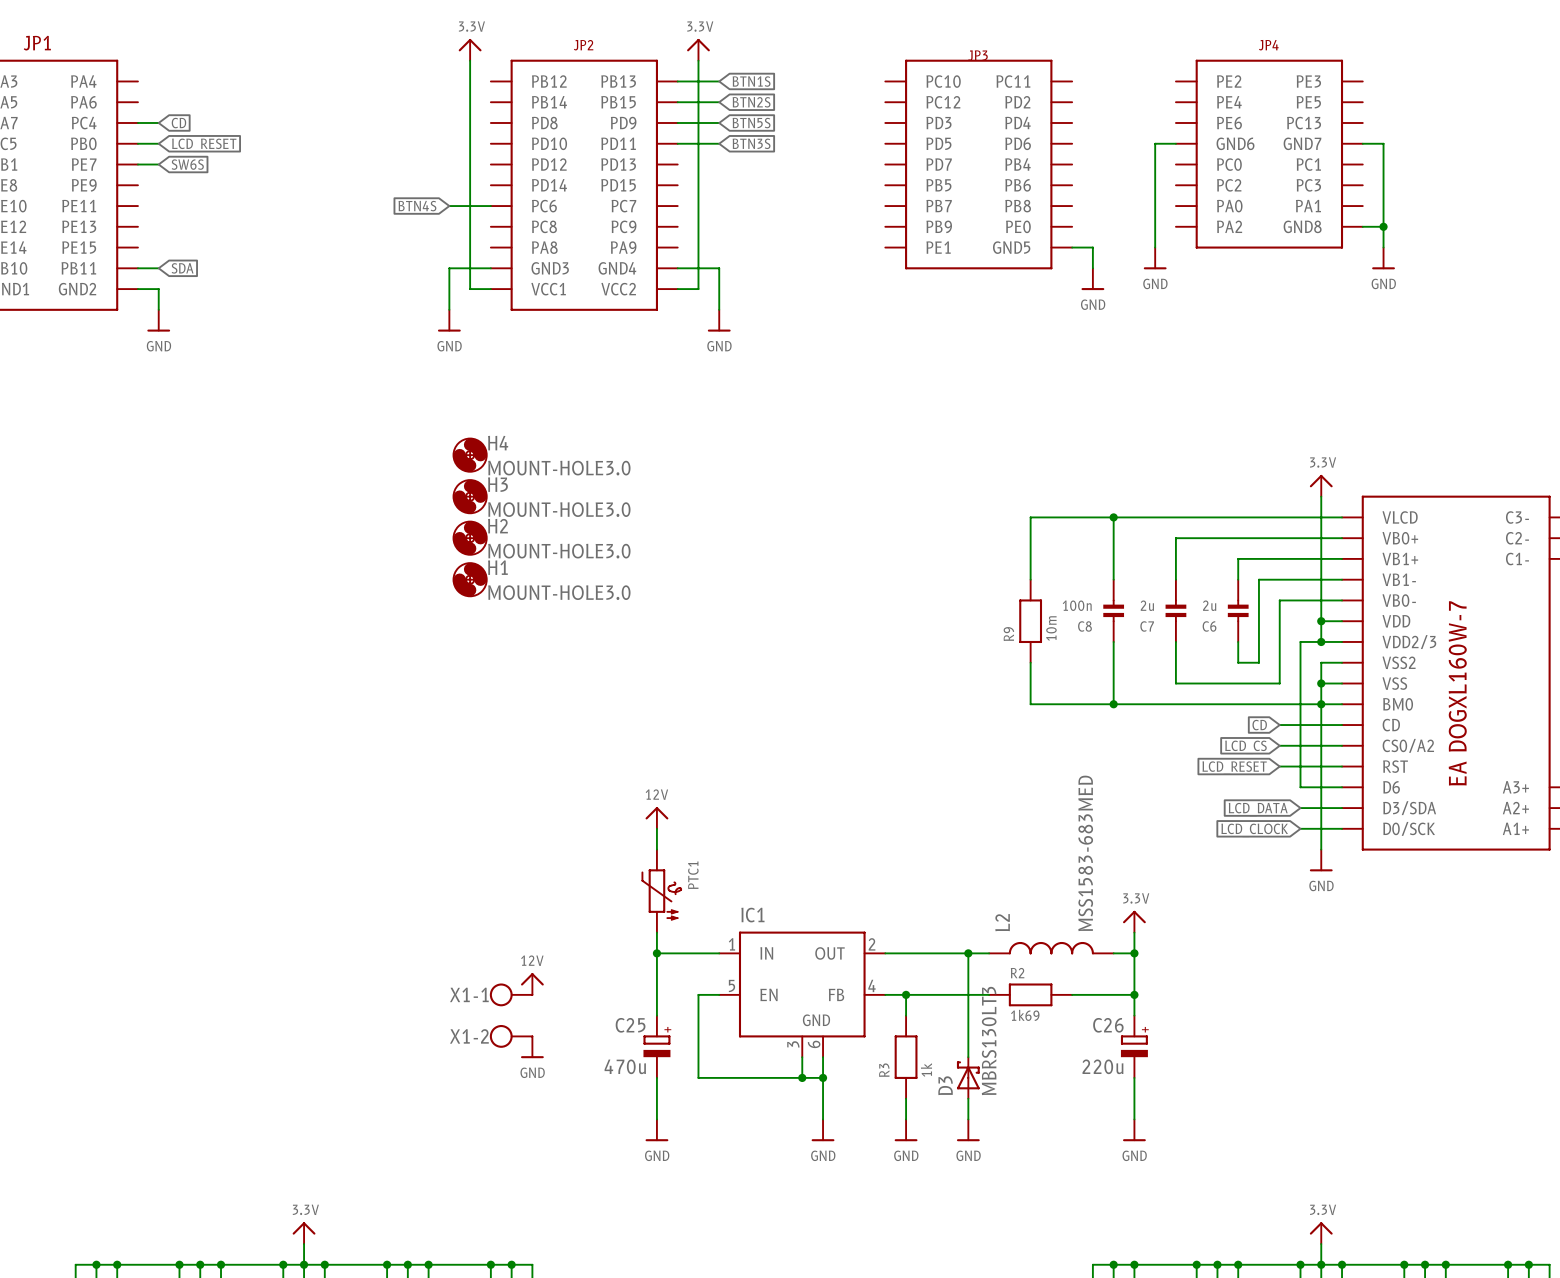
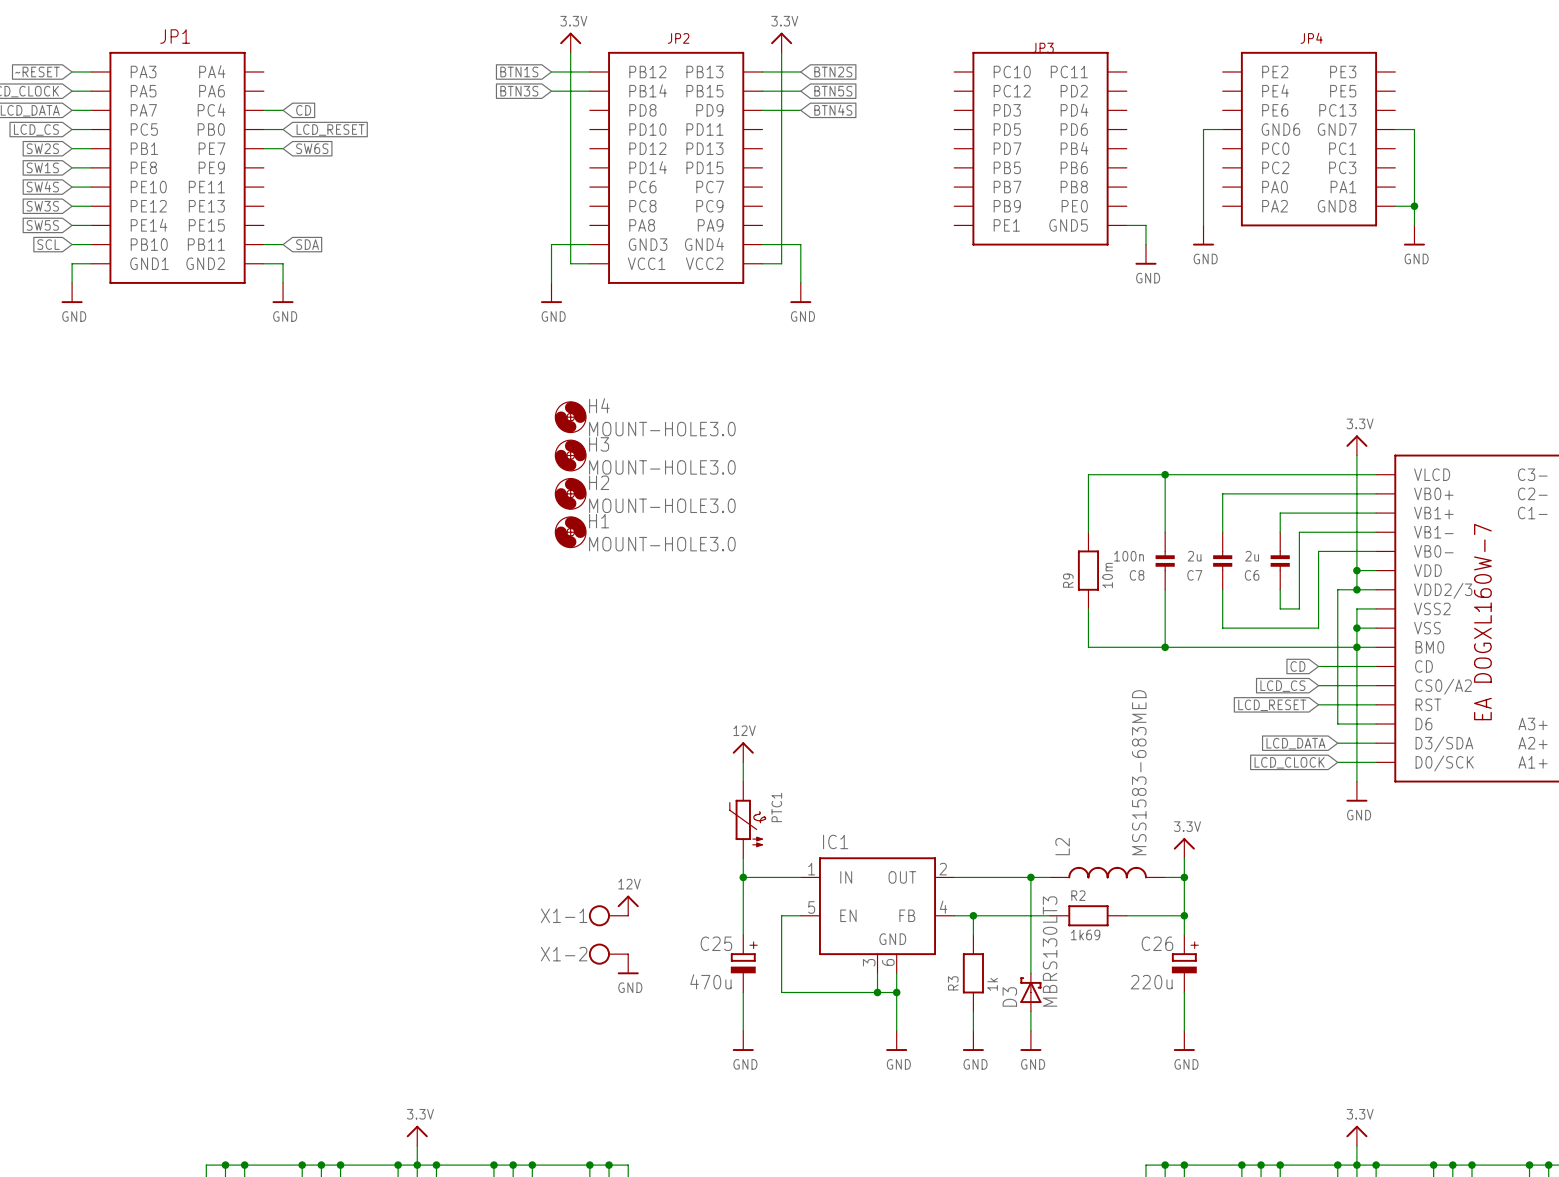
global label: none -> BTN1S (519, 72)
wire: none -> (551, 72) (589, 72)
global label: BTN1S (751, 81) -> BTN2S (833, 72)
global label: none -> BTN3S (519, 91)
global label: BTN2S (751, 102) -> BTN5S (833, 91)
global label: BTN5S (751, 123) -> BTN4S (833, 110)
wire: (677, 143) (719, 143) -> none
global label: BTN3S (751, 143) -> none
global label: BTN4S (417, 206) -> none
wire: (449, 206) (490, 206) -> (551, 91) (589, 91)

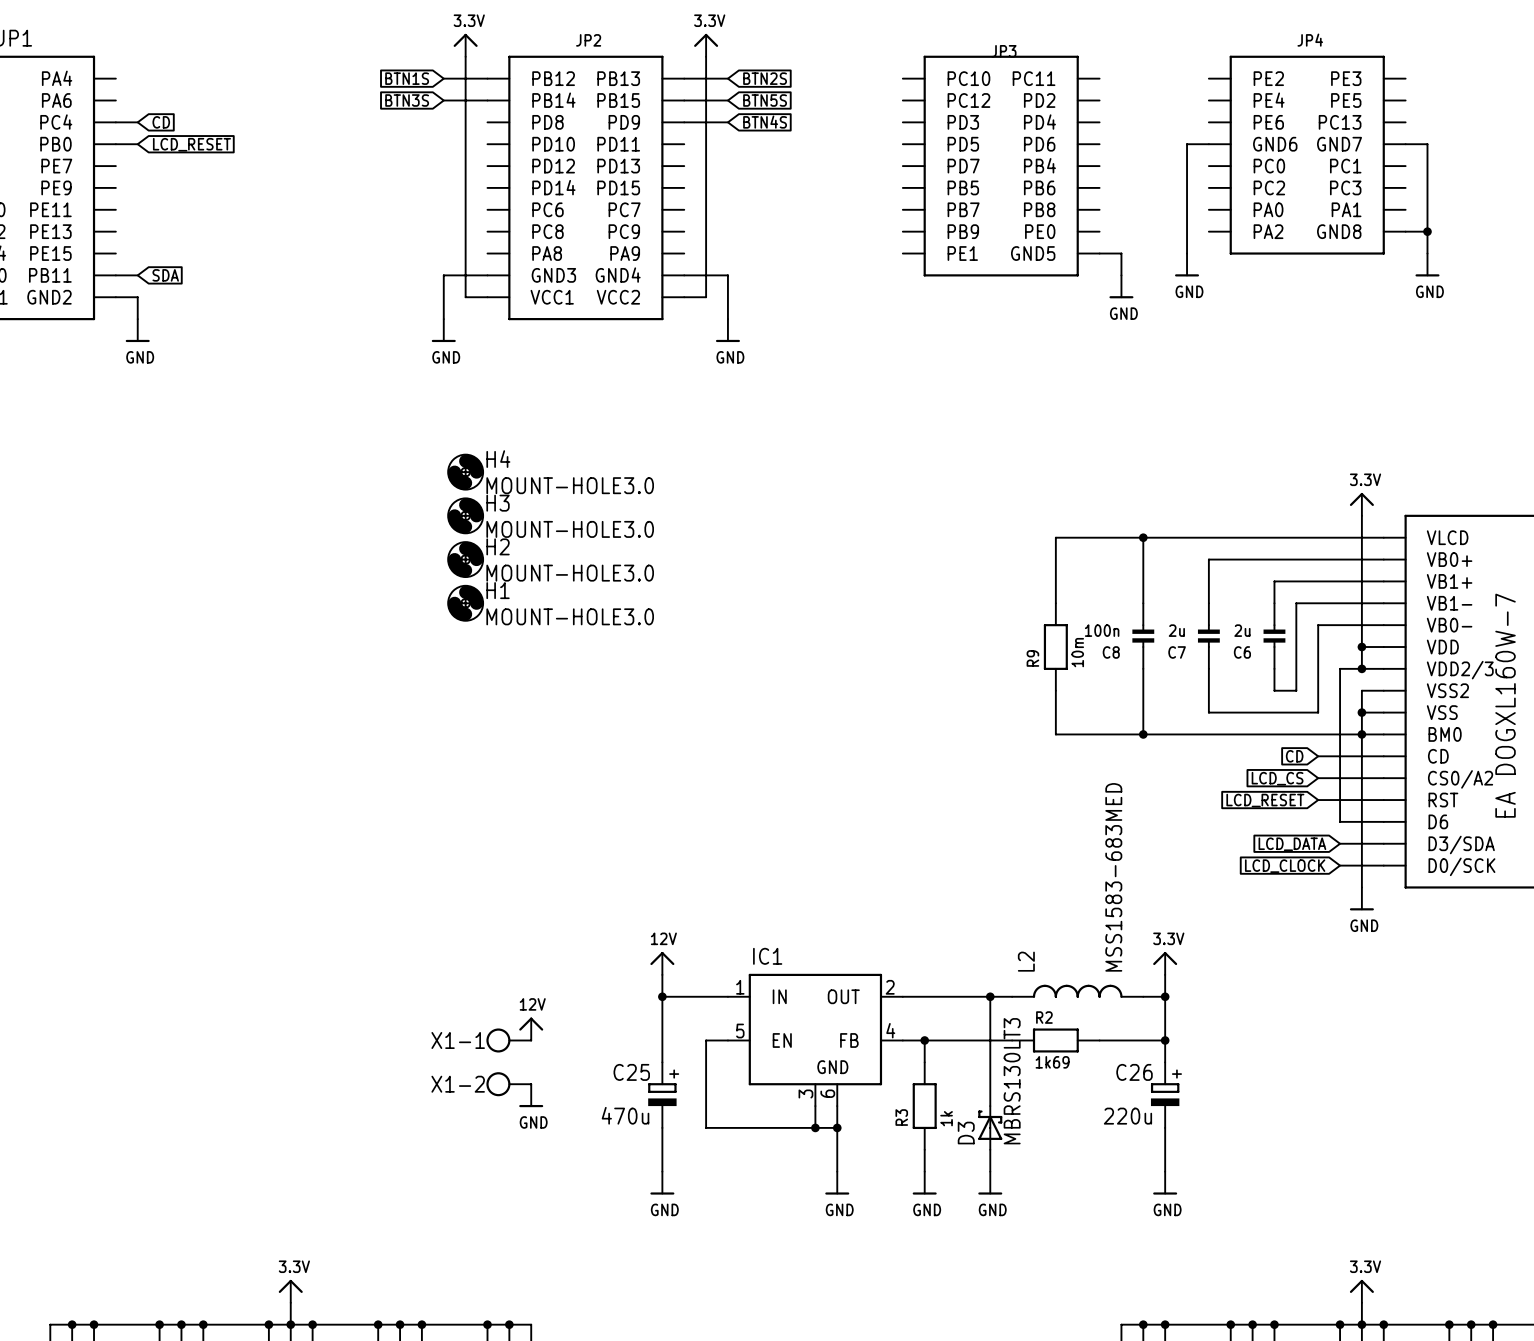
wire: (263, 148) (283, 148) -> none
global label: SW6S (312, 148) -> none
power symbol position: 12V (743, 752) -> 12V (662, 963)
wire: (743, 762) (743, 781) -> none
PTC1: (747, 819) -> none

